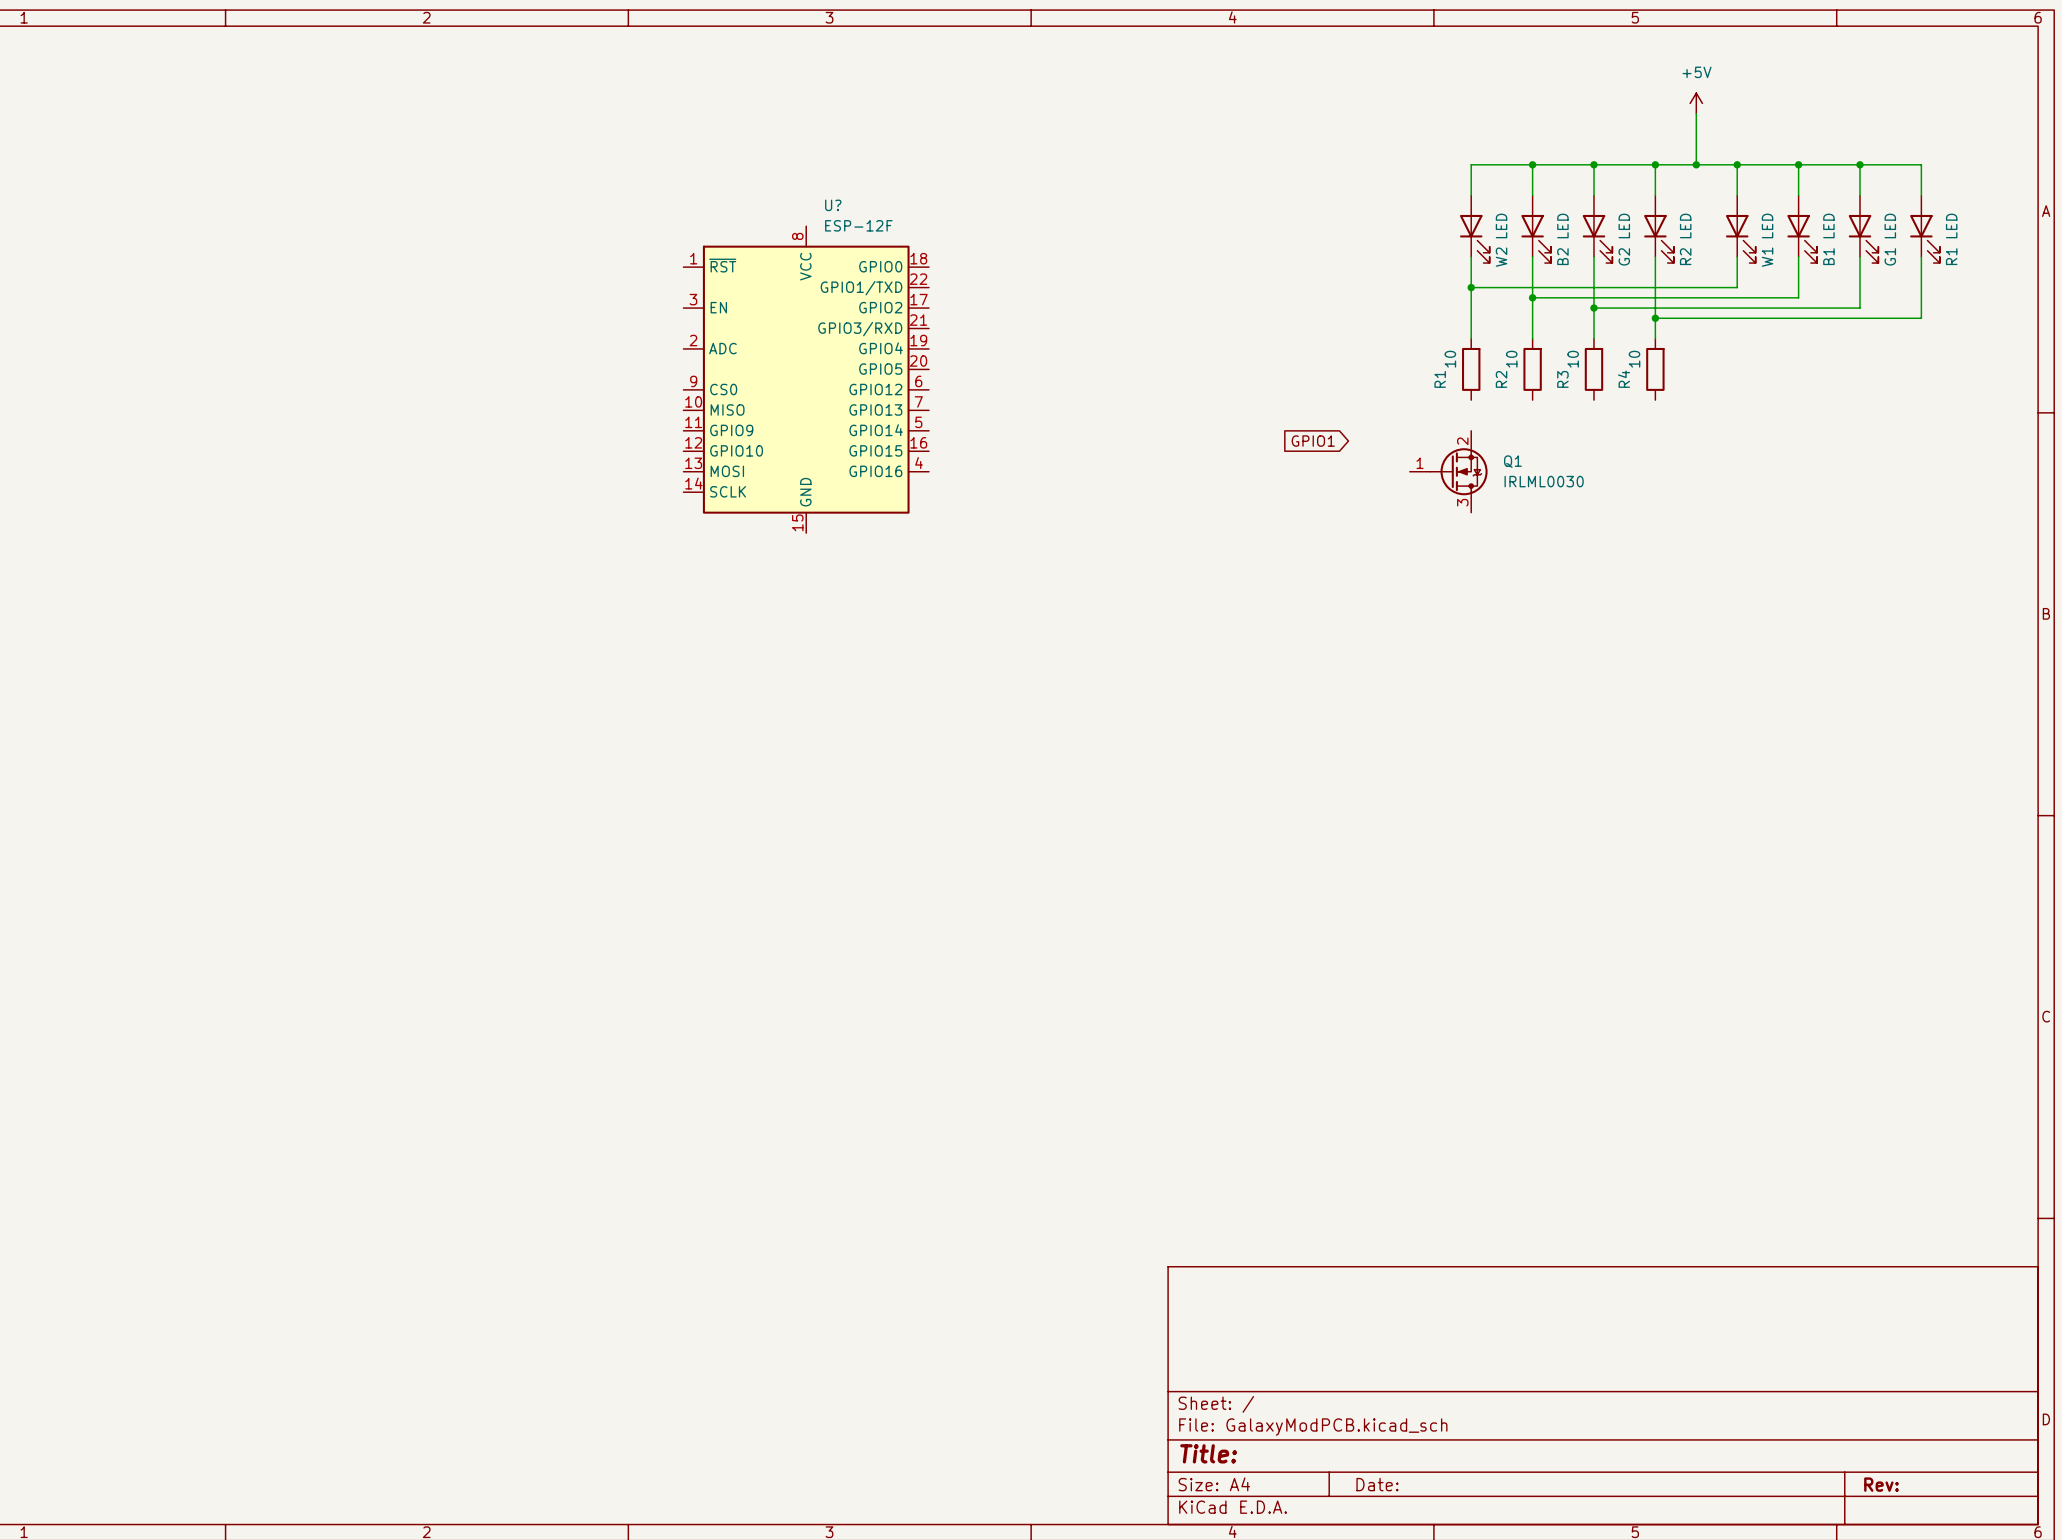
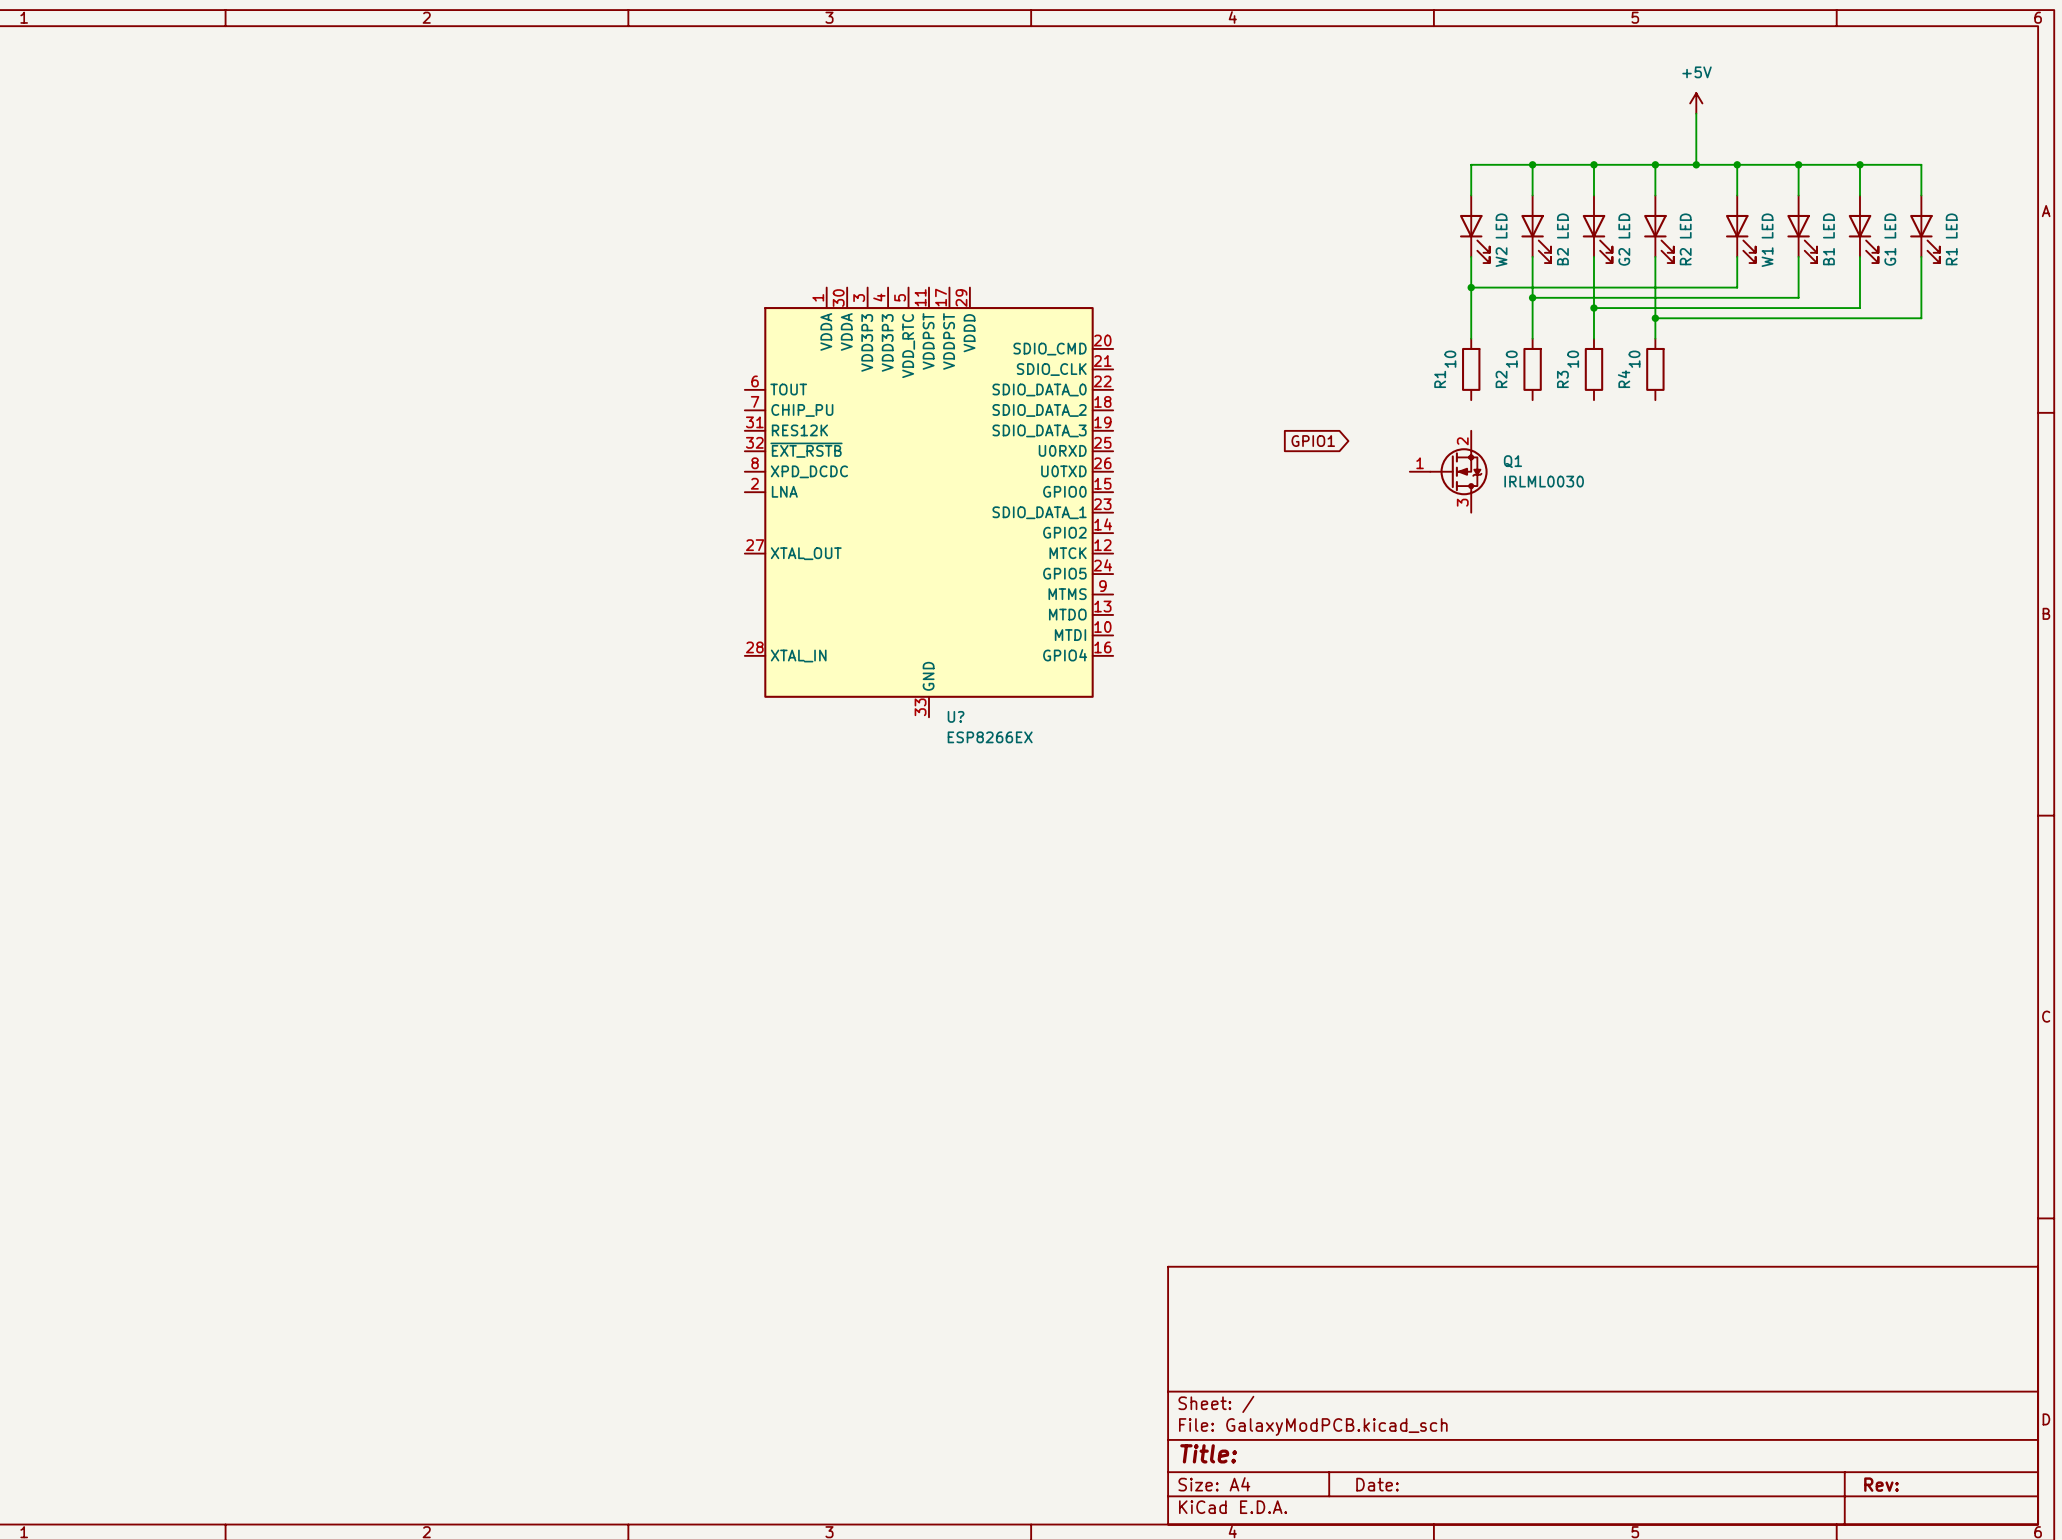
U?: ESP-12F (806, 379) -> none
U?: none -> ESP8266EX (928, 502)

